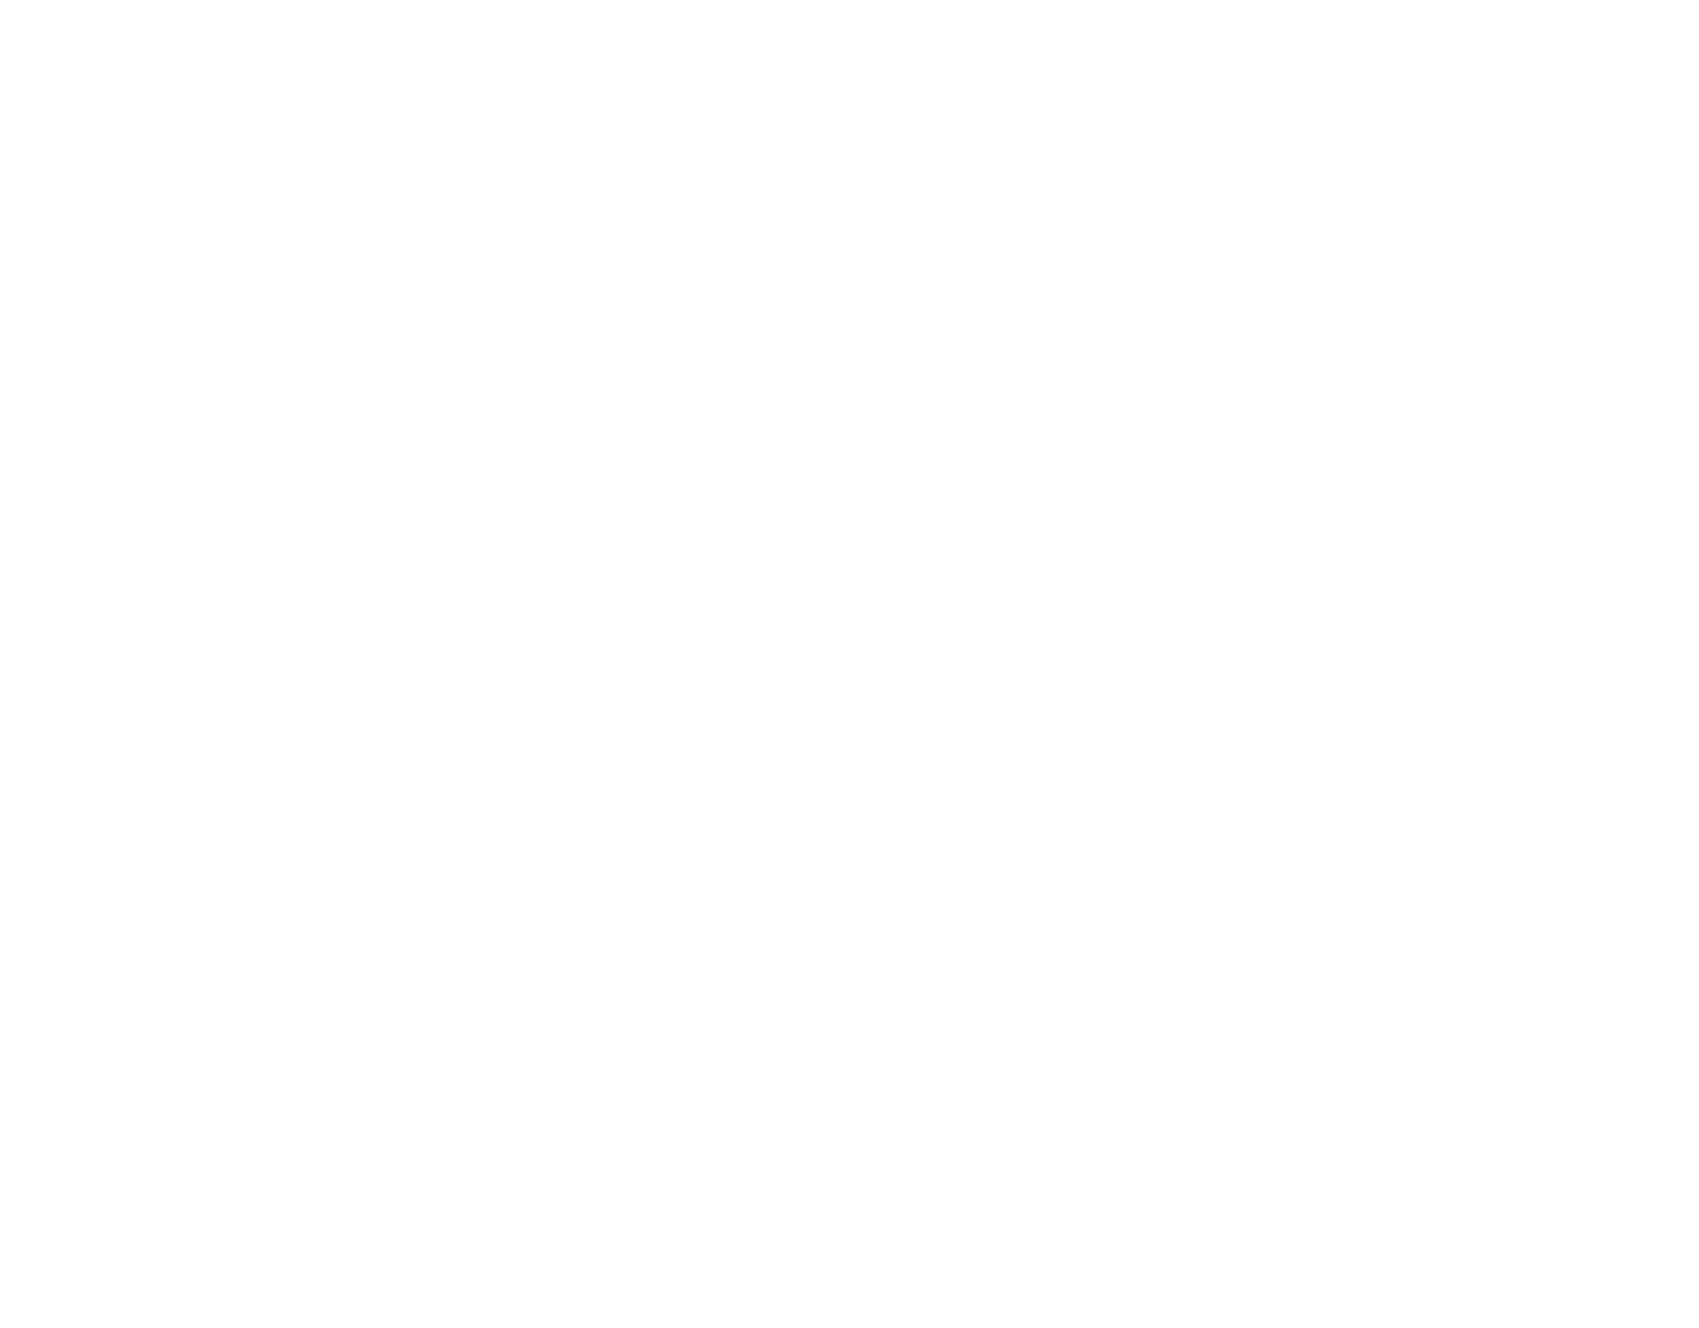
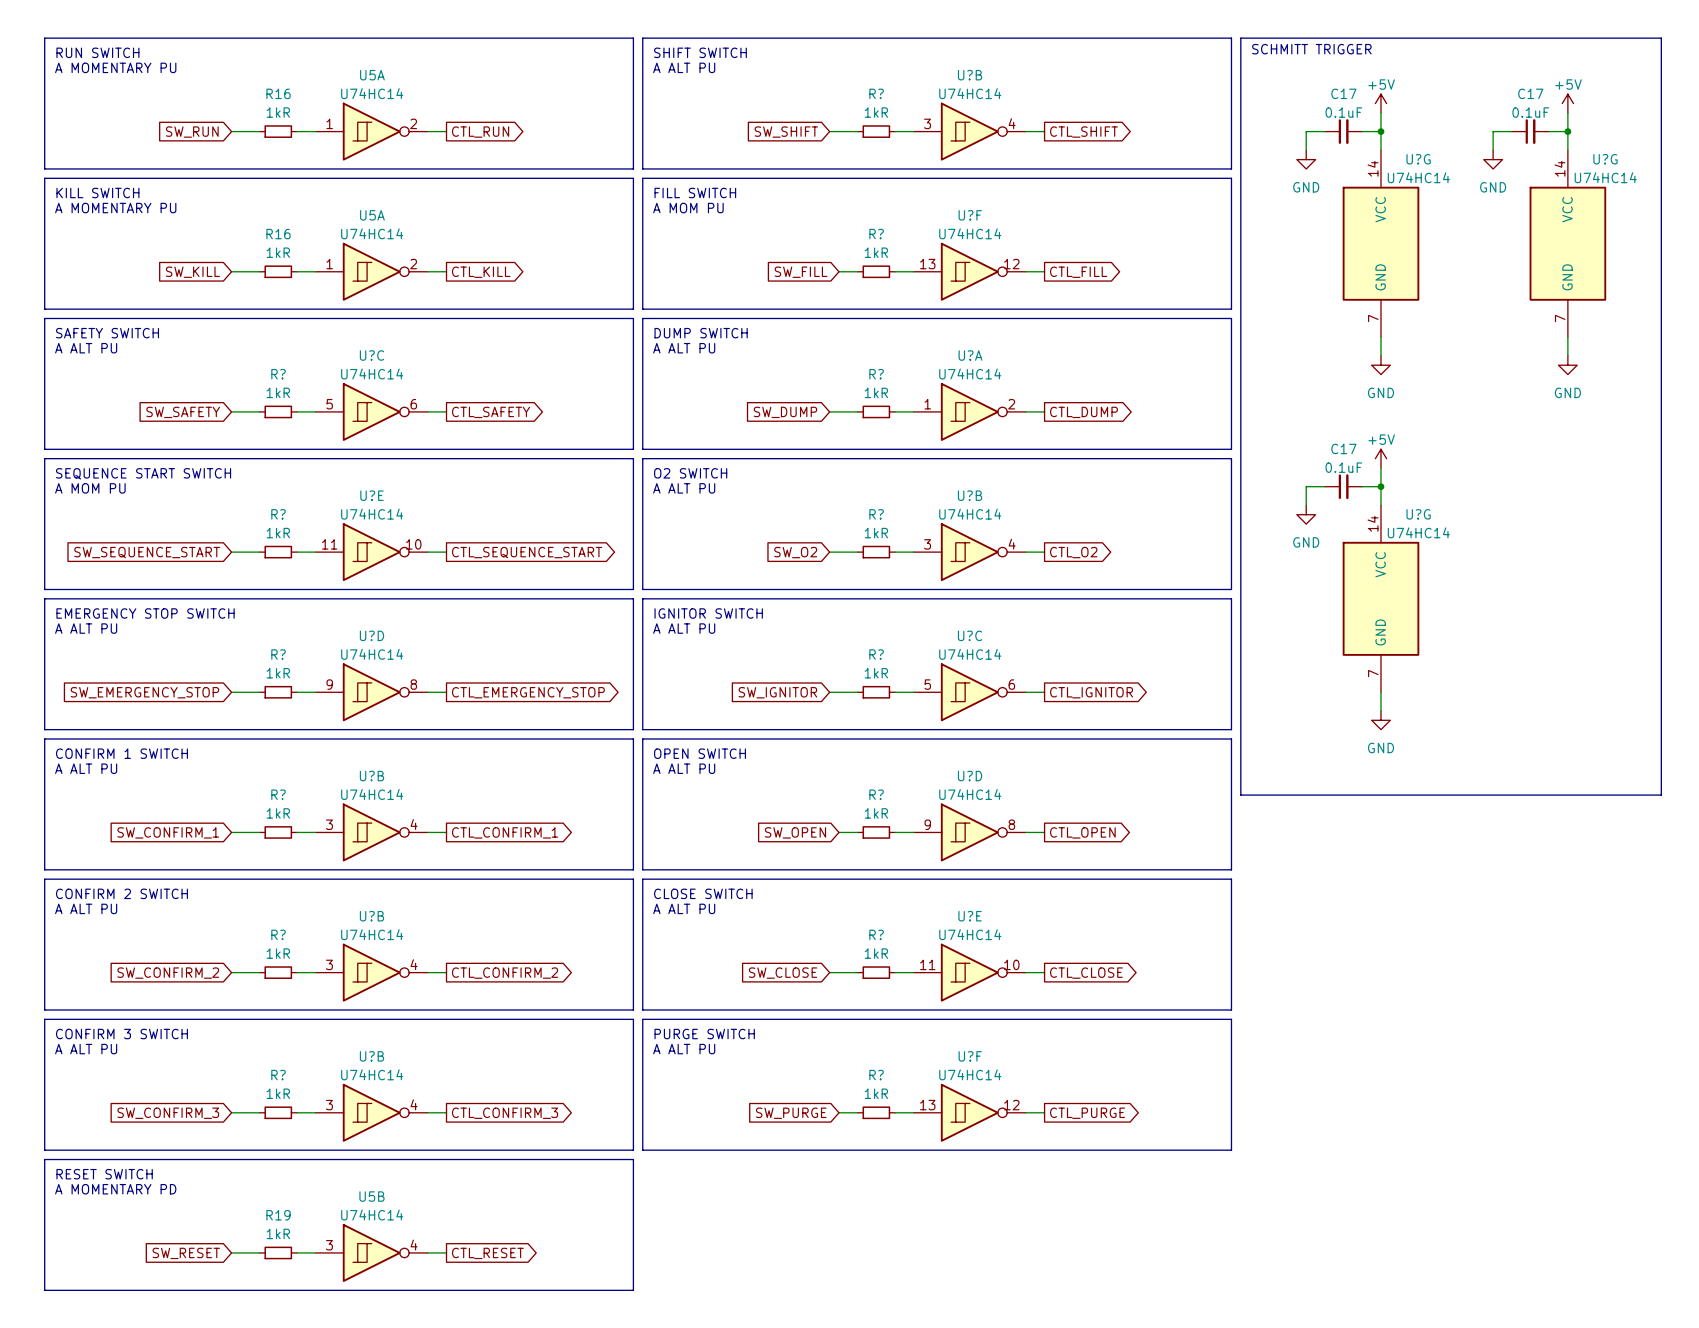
line: none -> (44, 38) (44, 168) (633, 168) (633, 38) (44, 38)
line: none -> (642, 38) (1231, 38) (1231, 168) (642, 168) (642, 38)
line: none -> (1240, 38) (1661, 38) (1661, 795) (1240, 795) (1240, 38)
text: none -> SCHMITT TRIGGER (1311, 49)
text: none -> RUN SWITCH (97, 52)
text: none -> SHIFT SWITCH (700, 52)
text: none -> A MOMENTARY PU (115, 67)
text: none -> A ALT PU (684, 67)
power symbol: none -> +5V (1380, 103)
power symbol: none -> +5V (1567, 103)
wire: none -> (1380, 112) (1380, 150)
wire: none -> (1567, 112) (1567, 150)
wire: none -> (231, 131) (259, 131)
R16: none -> 1kR (278, 131)
wire: none -> (296, 131) (315, 131)
U5A: none -> U74HC14 (371, 131)
wire: none -> (427, 131) (446, 131)
wire: none -> (829, 131) (857, 131)
R?: none -> 1kR (876, 131)
wire: none -> (895, 131) (913, 131)
U?B: none -> U74HC14 (969, 131)
wire: none -> (1025, 131) (1044, 131)
wire: none -> (1324, 131) (1306, 131) (1306, 150)
C17: none -> 0.1uF (1343, 131)
wire: none -> (1362, 131) (1380, 131)
junction: none -> (1380, 131)
wire: none -> (1511, 131) (1493, 131) (1493, 150)
C17: none -> 0.1uF (1530, 131)
wire: none -> (1549, 131) (1567, 131)
junction: none -> (1567, 131)
global label: none -> SW_RUN (192, 132)
global label: none -> CTL_RUN (480, 132)
global label: none -> SW_SHIFT (786, 132)
global label: none -> CTL_SHIFT (1083, 132)
power symbol: none -> GND (1306, 159)
power symbol: none -> GND (1493, 159)
line: none -> (44, 178) (633, 178) (633, 309) (44, 309) (44, 178)
line: none -> (642, 178) (1231, 178) (1231, 309) (642, 309) (642, 178)
text: none -> KILL SWITCH (97, 192)
text: none -> FILL SWITCH (695, 192)
text: none -> A MOMENTARY PU (115, 208)
text: none -> A MOM PU (688, 208)
U?G: none -> U74HC14 (1380, 243)
U?G: none -> U74HC14 (1567, 243)
wire: none -> (231, 271) (259, 271)
R16: none -> 1kR (278, 271)
wire: none -> (296, 271) (315, 271)
U5A: none -> U74HC14 (371, 271)
wire: none -> (427, 271) (446, 271)
wire: none -> (838, 271) (857, 271)
R?: none -> 1kR (876, 271)
wire: none -> (895, 271) (913, 271)
U?F: none -> U74HC14 (969, 271)
wire: none -> (1025, 271) (1044, 271)
global label: none -> SW_KILL (192, 272)
global label: none -> CTL_KILL (481, 272)
global label: none -> SW_FILL (801, 272)
global label: none -> CTL_FILL (1078, 272)
line: none -> (44, 318) (44, 449) (633, 449) (633, 318) (44, 318)
line: none -> (642, 318) (642, 449) (1231, 449) (1231, 318) (642, 318)
text: none -> SAFETY SWITCH (107, 333)
text: none -> DUMP SWITCH (701, 333)
wire: none -> (1380, 337) (1380, 355)
wire: none -> (1567, 337) (1567, 355)
text: none -> A ALT PU (86, 348)
text: none -> A ALT PU (684, 348)
power symbol: none -> GND (1380, 365)
power symbol: none -> GND (1567, 365)
wire: none -> (231, 411) (259, 411)
R?: none -> 1kR (278, 411)
wire: none -> (296, 411) (315, 411)
U?C: none -> U74HC14 (371, 411)
wire: none -> (427, 411) (446, 411)
wire: none -> (829, 411) (857, 411)
R?: none -> 1kR (876, 411)
wire: none -> (895, 411) (913, 411)
U?A: none -> U74HC14 (969, 411)
wire: none -> (1025, 411) (1044, 411)
global label: none -> SW_SAFETY (183, 412)
global label: none -> CTL_SAFETY (491, 412)
global label: none -> SW_DUMP (785, 412)
global label: none -> CTL_DUMP (1083, 412)
line: none -> (44, 458) (44, 589) (633, 589) (633, 458) (44, 458)
line: none -> (642, 458) (642, 589) (1231, 589) (1231, 458) (642, 458)
power symbol: none -> +5V (1380, 458)
wire: none -> (1380, 468) (1380, 505)
text: none -> SEQUENCE START SWITCH (143, 473)
text: none -> O2 SWITCH (690, 473)
wire: none -> (1324, 486) (1306, 486) (1306, 505)
C17: none -> 0.1uF (1343, 486)
wire: none -> (1362, 486) (1380, 486)
junction: none -> (1380, 486)
text: none -> A MOM PU (90, 488)
text: none -> A ALT PU (684, 488)
power symbol: none -> GND (1306, 514)
global label: none -> SW_SEQUENCE_START (147, 552)
wire: none -> (231, 552) (259, 552)
R?: none -> 1kR (278, 552)
wire: none -> (296, 552) (315, 552)
U?E: none -> U74HC14 (371, 552)
wire: none -> (427, 552) (446, 552)
global label: none -> CTL_SEQUENCE_START (527, 552)
global label: none -> SW_O2 (795, 552)
wire: none -> (829, 552) (857, 552)
R?: none -> 1kR (876, 552)
wire: none -> (895, 552) (913, 552)
U?B: none -> U74HC14 (969, 552)
wire: none -> (1025, 552) (1044, 552)
global label: none -> CTL_O2 (1073, 552)
line: none -> (44, 598) (44, 729) (633, 729) (633, 598) (44, 598)
line: none -> (642, 598) (1231, 598) (1231, 729) (642, 729) (642, 598)
U?G: none -> U74HC14 (1380, 598)
text: none -> EMERGENCY STOP SWITCH (145, 613)
text: none -> IGNITOR SWITCH (708, 613)
text: none -> A ALT PU (86, 628)
text: none -> A ALT PU (684, 628)
global label: none -> SW_EMERGENCY_STOP (144, 692)
wire: none -> (231, 692) (259, 692)
R?: none -> 1kR (278, 692)
wire: none -> (296, 692) (315, 692)
U?D: none -> U74HC14 (371, 692)
wire: none -> (427, 692) (446, 692)
global label: none -> CTL_EMERGENCY_STOP (528, 692)
global label: none -> SW_IGNITOR (777, 692)
wire: none -> (829, 692) (857, 692)
R?: none -> 1kR (876, 692)
wire: none -> (895, 692) (913, 692)
U?C: none -> U74HC14 (969, 692)
wire: none -> (1025, 692) (1044, 692)
global label: none -> CTL_IGNITOR (1091, 692)
wire: none -> (1380, 692) (1380, 710)
power symbol: none -> GND (1380, 720)
line: none -> (44, 739) (44, 869) (633, 869) (633, 739) (44, 739)
line: none -> (642, 739) (642, 869) (1231, 869) (1231, 739) (642, 739)
text: none -> CONFIRM 1 SWITCH (121, 753)
text: none -> OPEN SWITCH (700, 753)
text: none -> A ALT PU (86, 768)
text: none -> A ALT PU (684, 768)
global label: none -> SW_CONFIRM_1 (168, 832)
wire: none -> (231, 832) (259, 832)
R?: none -> 1kR (278, 832)
wire: none -> (296, 832) (315, 832)
U?B: none -> U74HC14 (371, 832)
wire: none -> (427, 832) (446, 832)
global label: none -> CTL_CONFIRM_1 (505, 832)
global label: none -> SW_OPEN (795, 832)
wire: none -> (838, 832) (857, 832)
R?: none -> 1kR (876, 832)
wire: none -> (895, 832) (913, 832)
U?D: none -> U74HC14 (969, 832)
wire: none -> (1025, 832) (1044, 832)
global label: none -> CTL_OPEN (1082, 832)
line: none -> (44, 879) (44, 1010) (633, 1010) (633, 879) (44, 879)
line: none -> (642, 879) (1231, 879) (1231, 1010) (642, 1010) (642, 879)
text: none -> CONFIRM 2 SWITCH (121, 893)
text: none -> CLOSE SWITCH (703, 893)
text: none -> A ALT PU (86, 908)
text: none -> A ALT PU (684, 908)
wire: none -> (231, 972) (259, 972)
R?: none -> 1kR (278, 972)
wire: none -> (296, 972) (315, 972)
U?B: none -> U74HC14 (371, 972)
wire: none -> (427, 972) (446, 972)
wire: none -> (829, 972) (857, 972)
R?: none -> 1kR (876, 972)
wire: none -> (895, 972) (913, 972)
U?E: none -> U74HC14 (969, 972)
wire: none -> (1025, 972) (1044, 972)
global label: none -> SW_CONFIRM_2 (168, 973)
global label: none -> CTL_CONFIRM_2 (505, 973)
global label: none -> SW_CLOSE (783, 973)
global label: none -> CTL_CLOSE (1086, 973)
line: none -> (44, 1019) (44, 1150) (633, 1150) (633, 1019) (44, 1019)
line: none -> (642, 1019) (642, 1150) (1231, 1150) (1231, 1019) (642, 1019)
text: none -> CONFIRM 3 SWITCH (121, 1034)
text: none -> PURGE SWITCH (704, 1034)
text: none -> A ALT PU (86, 1049)
text: none -> A ALT PU (684, 1049)
wire: none -> (231, 1112) (259, 1112)
R?: none -> 1kR (278, 1112)
wire: none -> (296, 1112) (315, 1112)
U?B: none -> U74HC14 (371, 1112)
wire: none -> (427, 1112) (446, 1112)
wire: none -> (838, 1112) (857, 1112)
R?: none -> 1kR (876, 1112)
wire: none -> (895, 1112) (913, 1112)
U?F: none -> U74HC14 (969, 1112)
wire: none -> (1025, 1112) (1044, 1112)
global label: none -> SW_CONFIRM_3 (168, 1113)
global label: none -> CTL_CONFIRM_3 (505, 1113)
global label: none -> SW_PURGE (791, 1113)
global label: none -> CTL_PURGE (1087, 1113)
line: none -> (44, 1159) (44, 1290) (633, 1290) (633, 1159) (44, 1159)
text: none -> RESET SWITCH (104, 1174)
text: none -> A MOMENTARY PD (115, 1189)
wire: none -> (231, 1252) (259, 1252)
R19: none -> 1kR (278, 1252)
wire: none -> (296, 1252) (315, 1252)
U5B: none -> U74HC14 (371, 1252)
wire: none -> (427, 1252) (446, 1252)
global label: none -> SW_RESET (186, 1253)
global label: none -> CTL_RESET (487, 1253)

